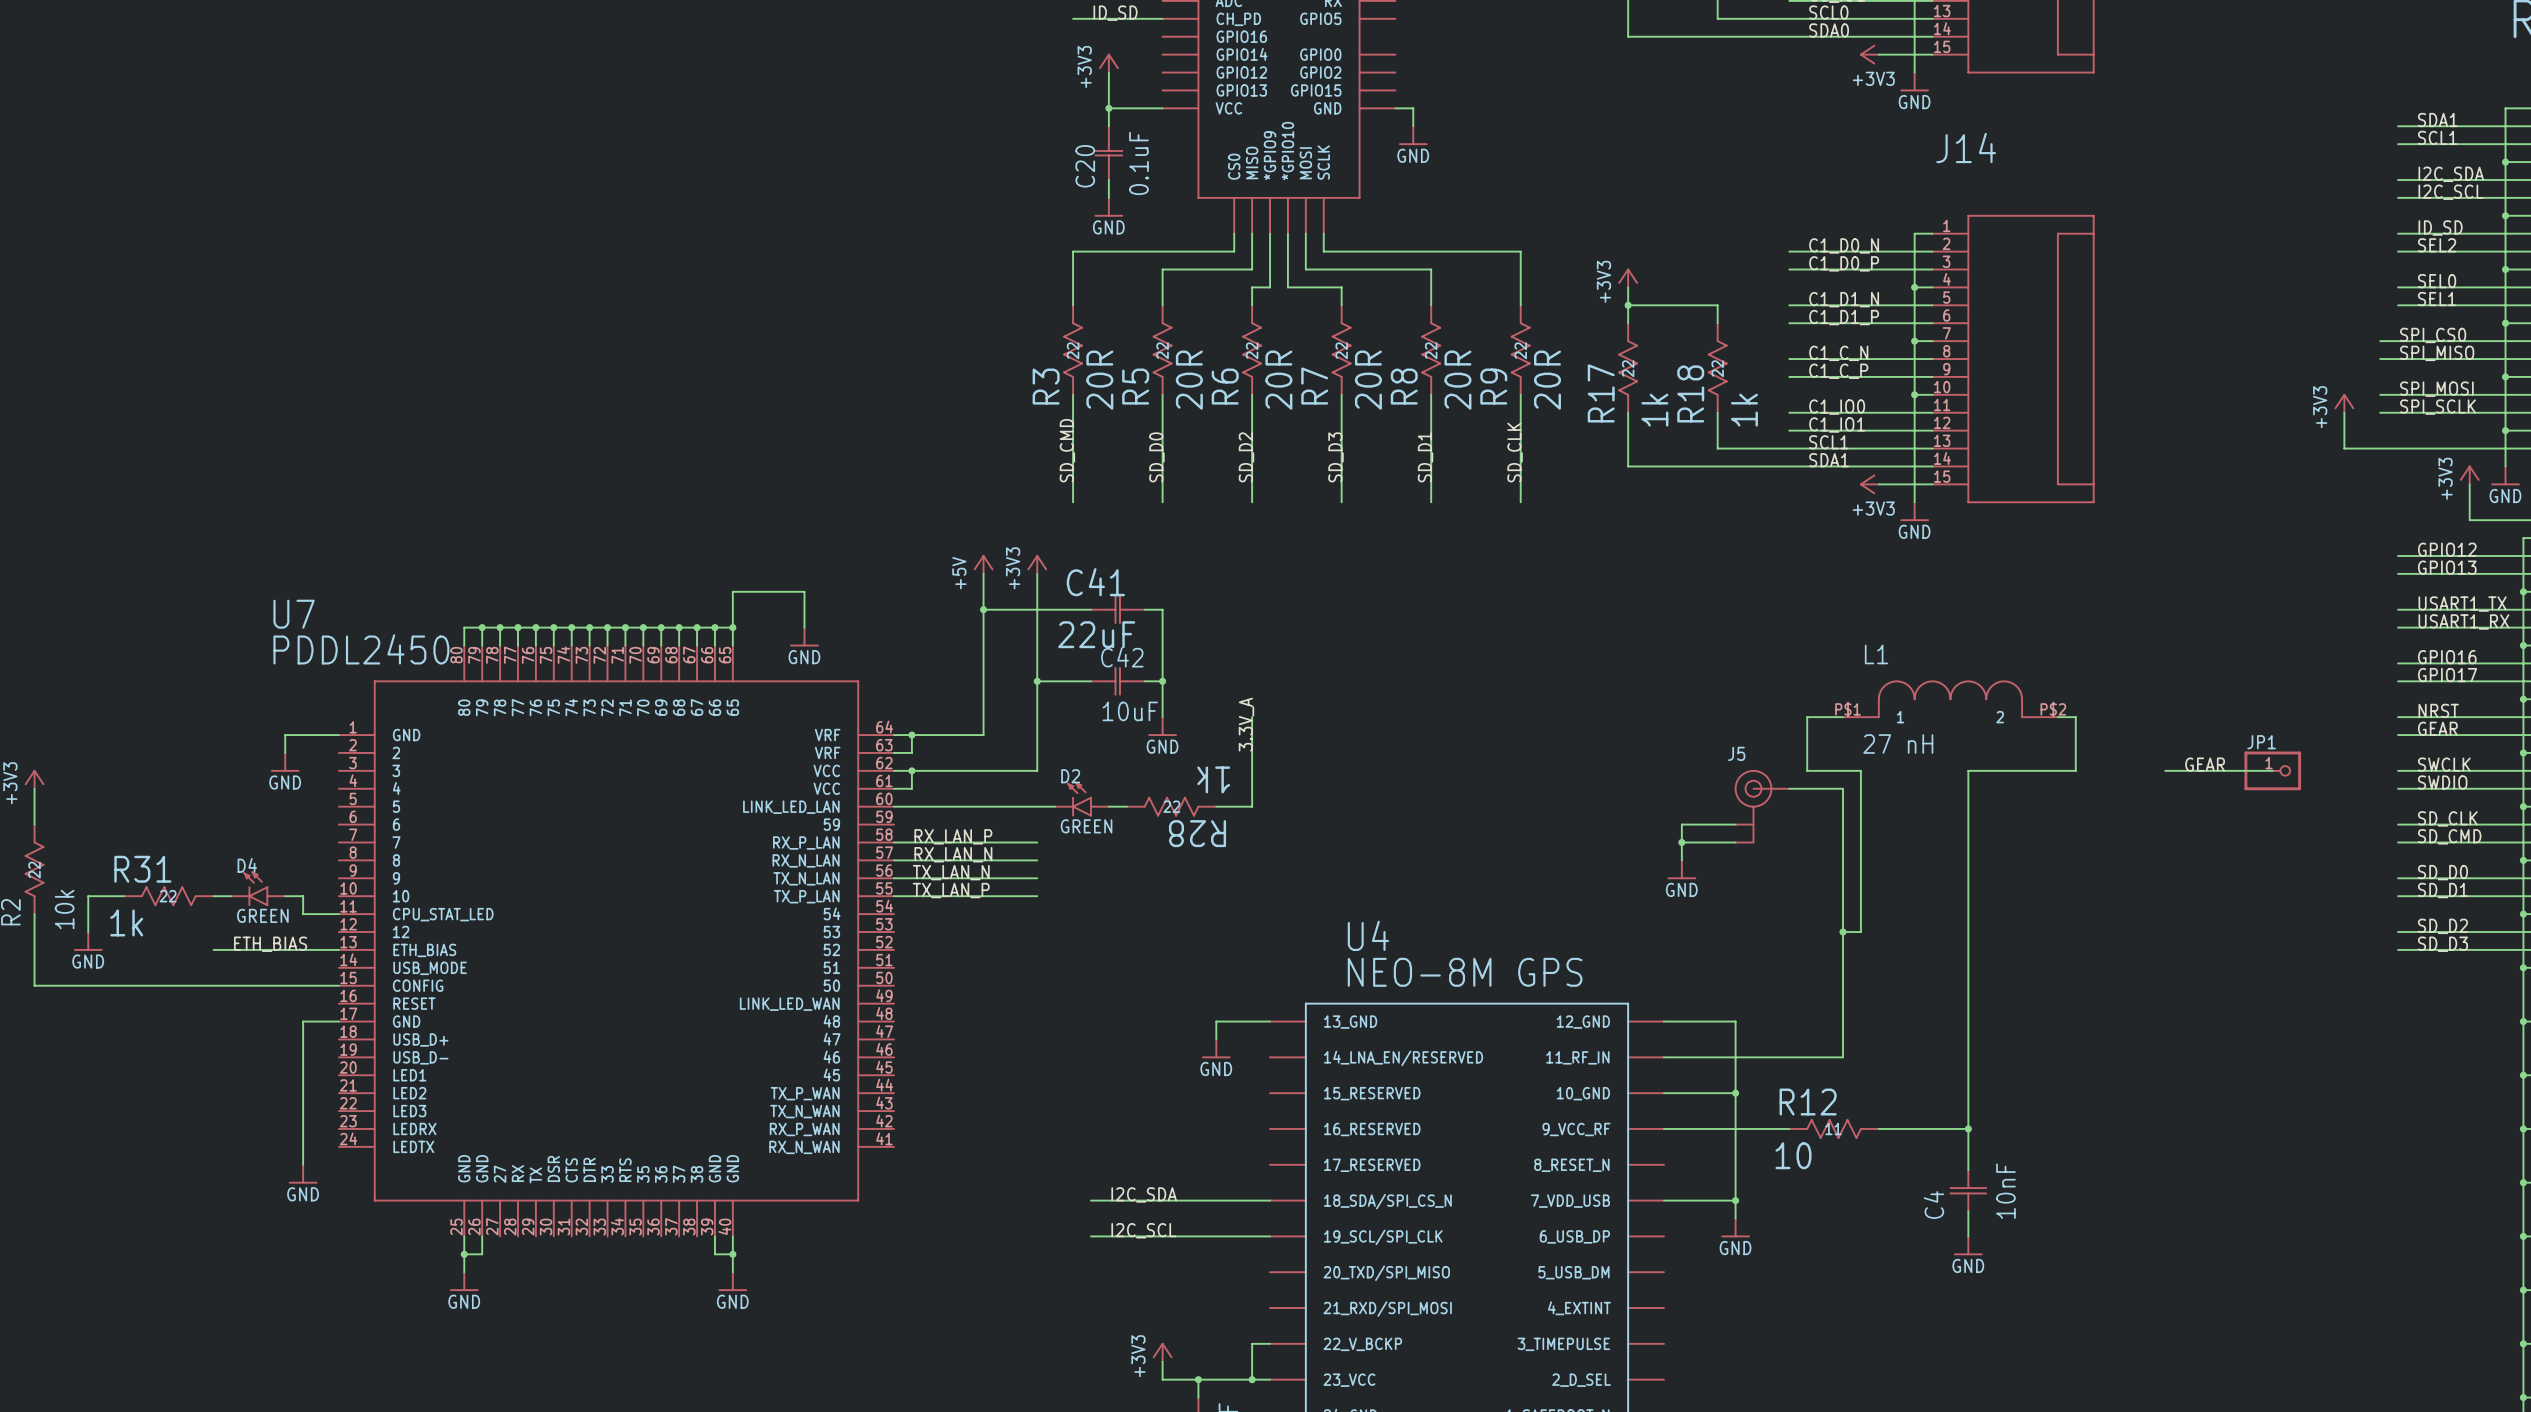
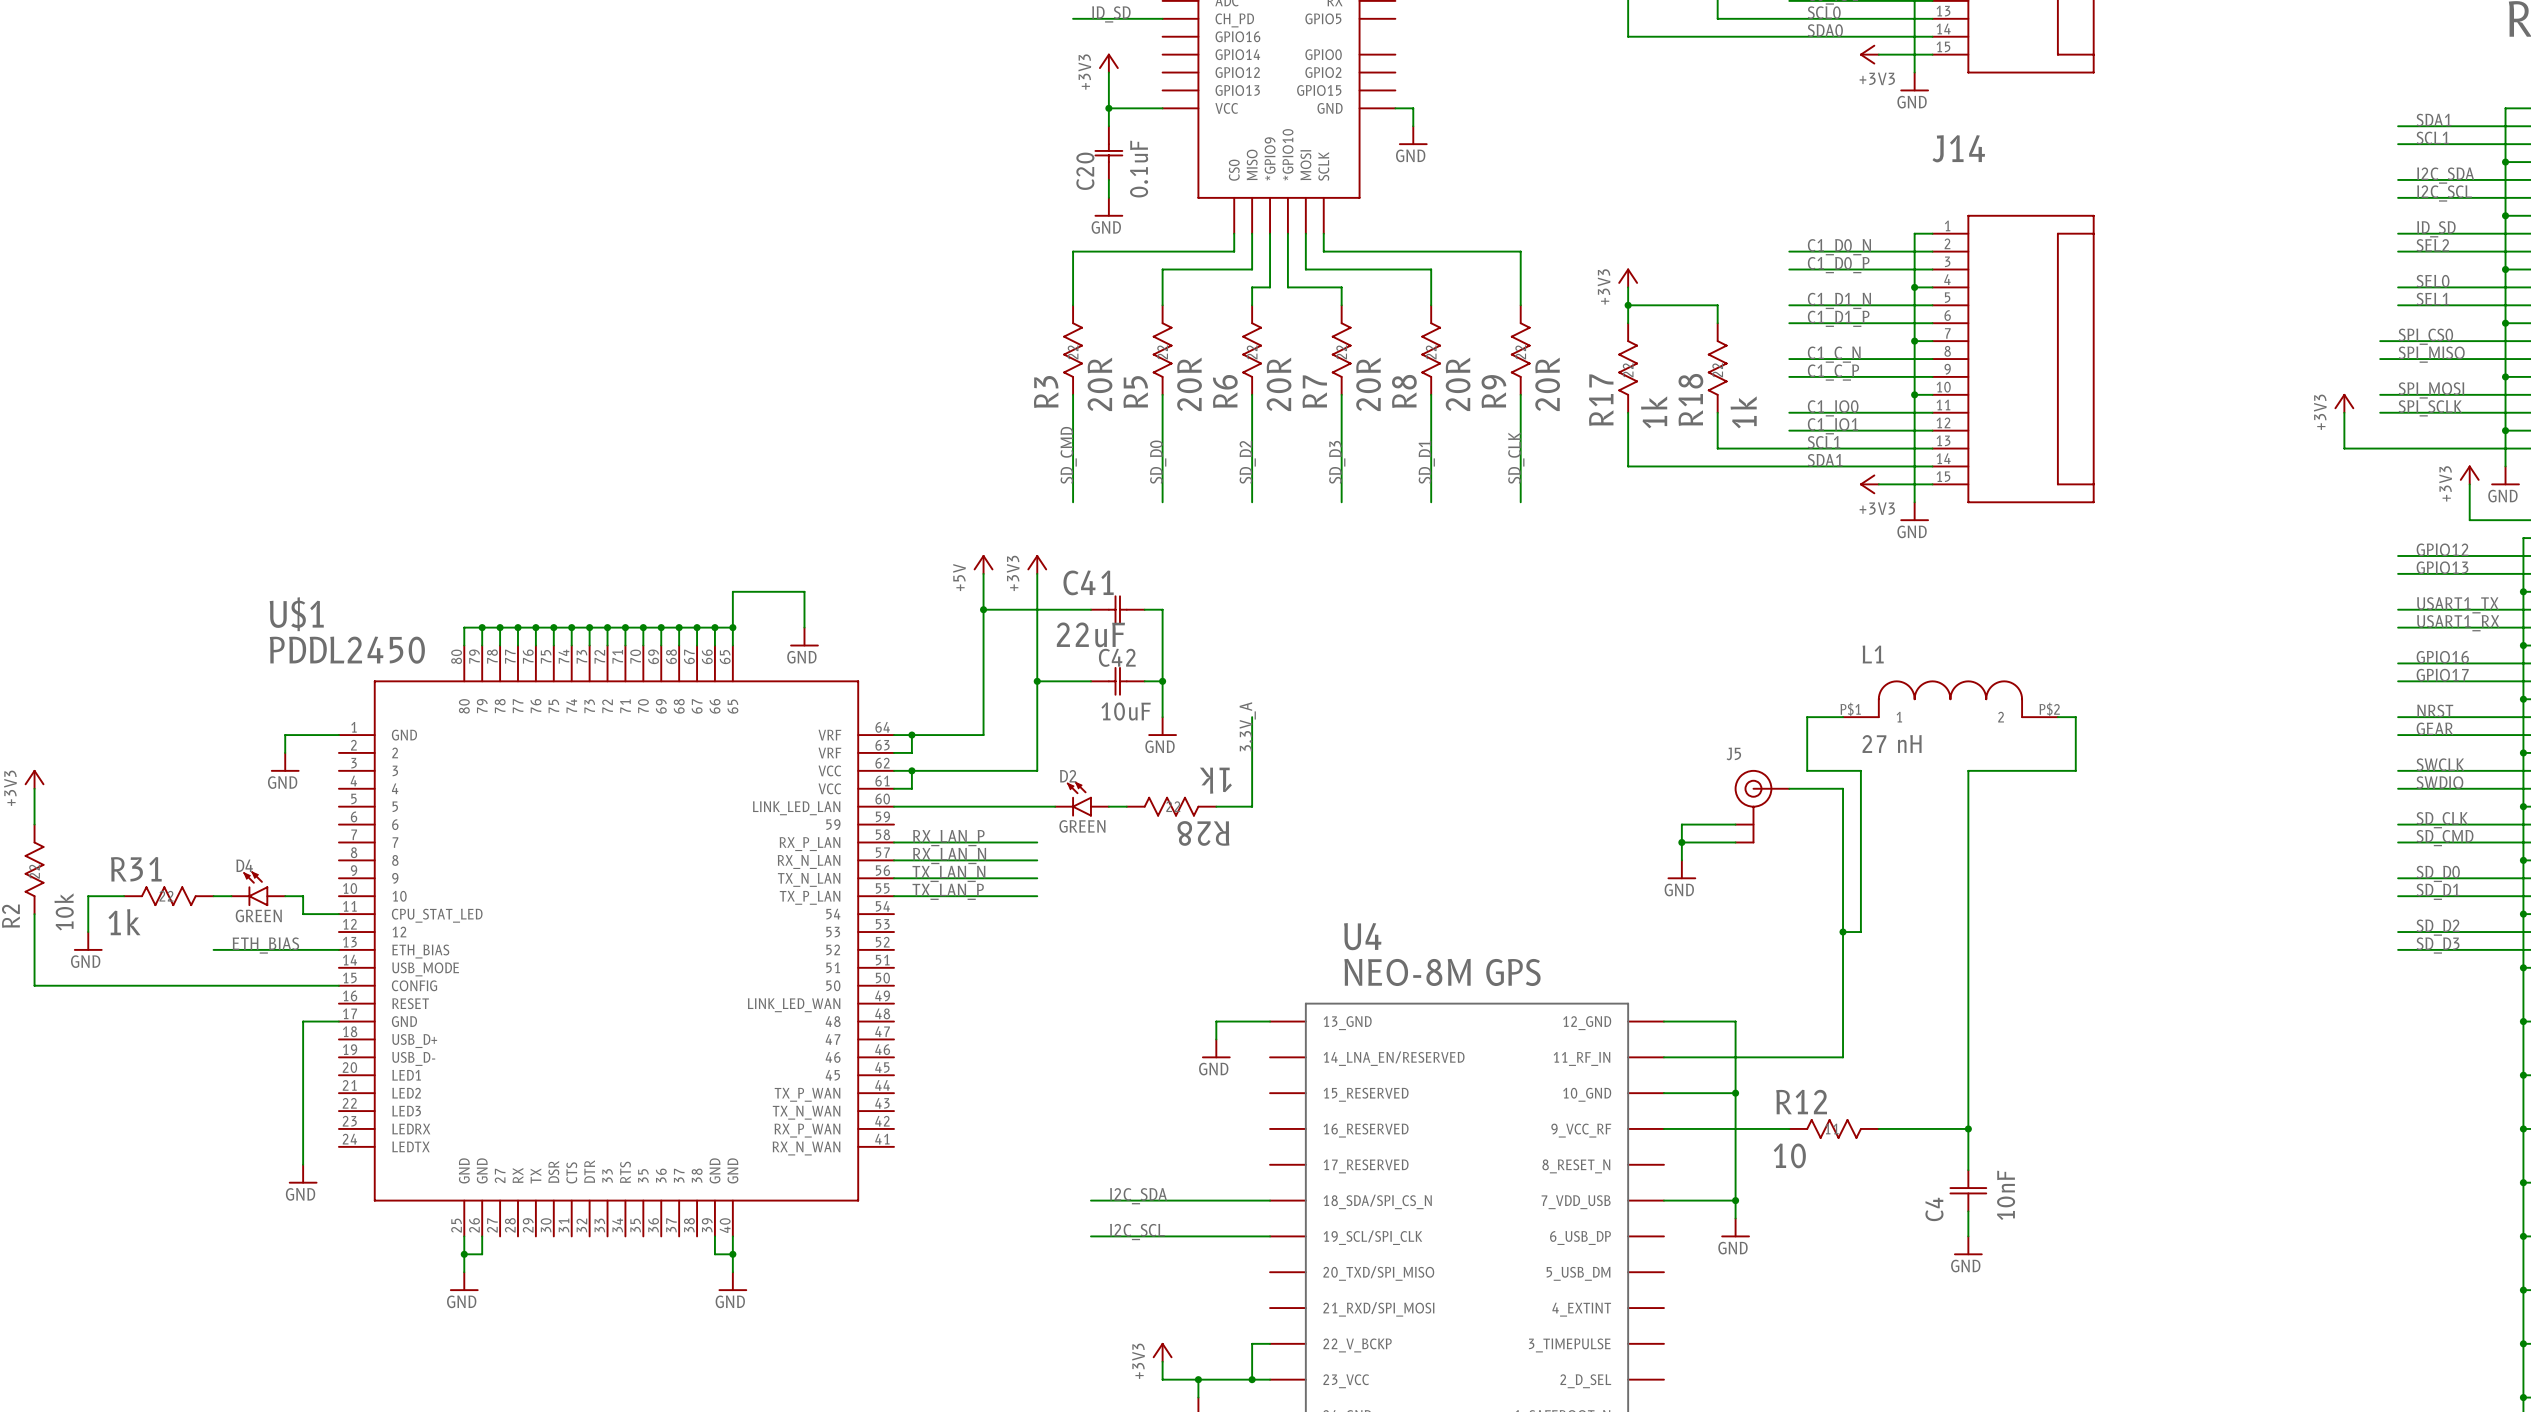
U7 name: U7 (294, 614) -> U$1 (296, 614)
label: GEAR (2205, 764) -> none
wire: (2165, 770) (2272, 770) -> none
JP1: (2272, 770) -> none

